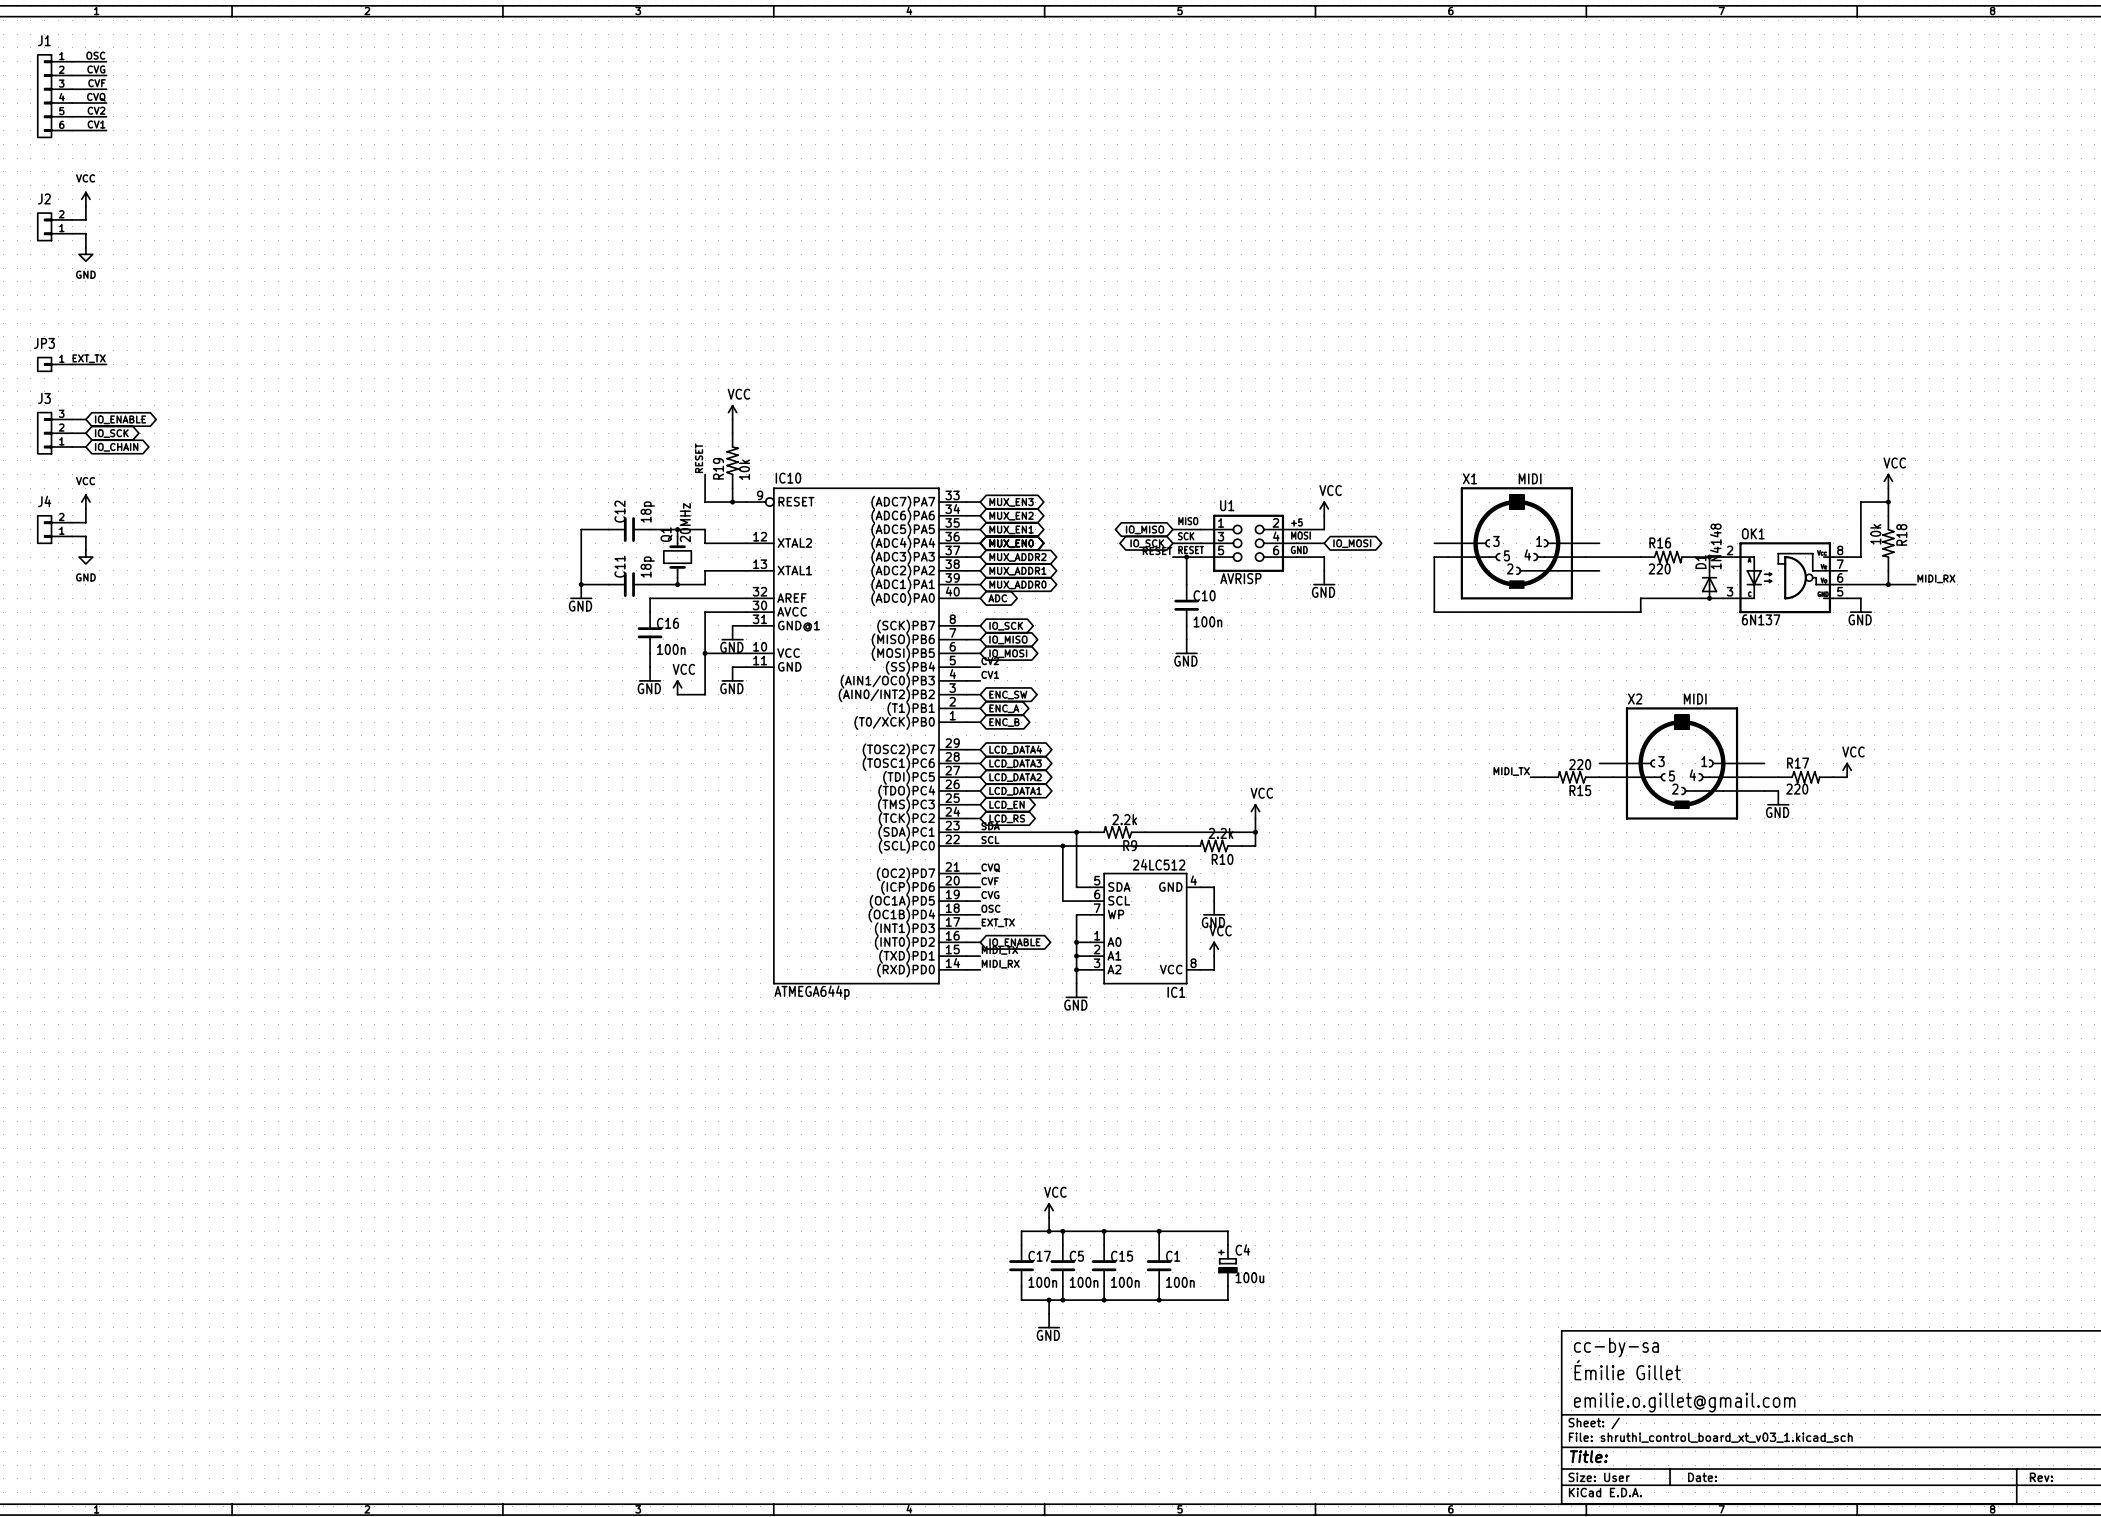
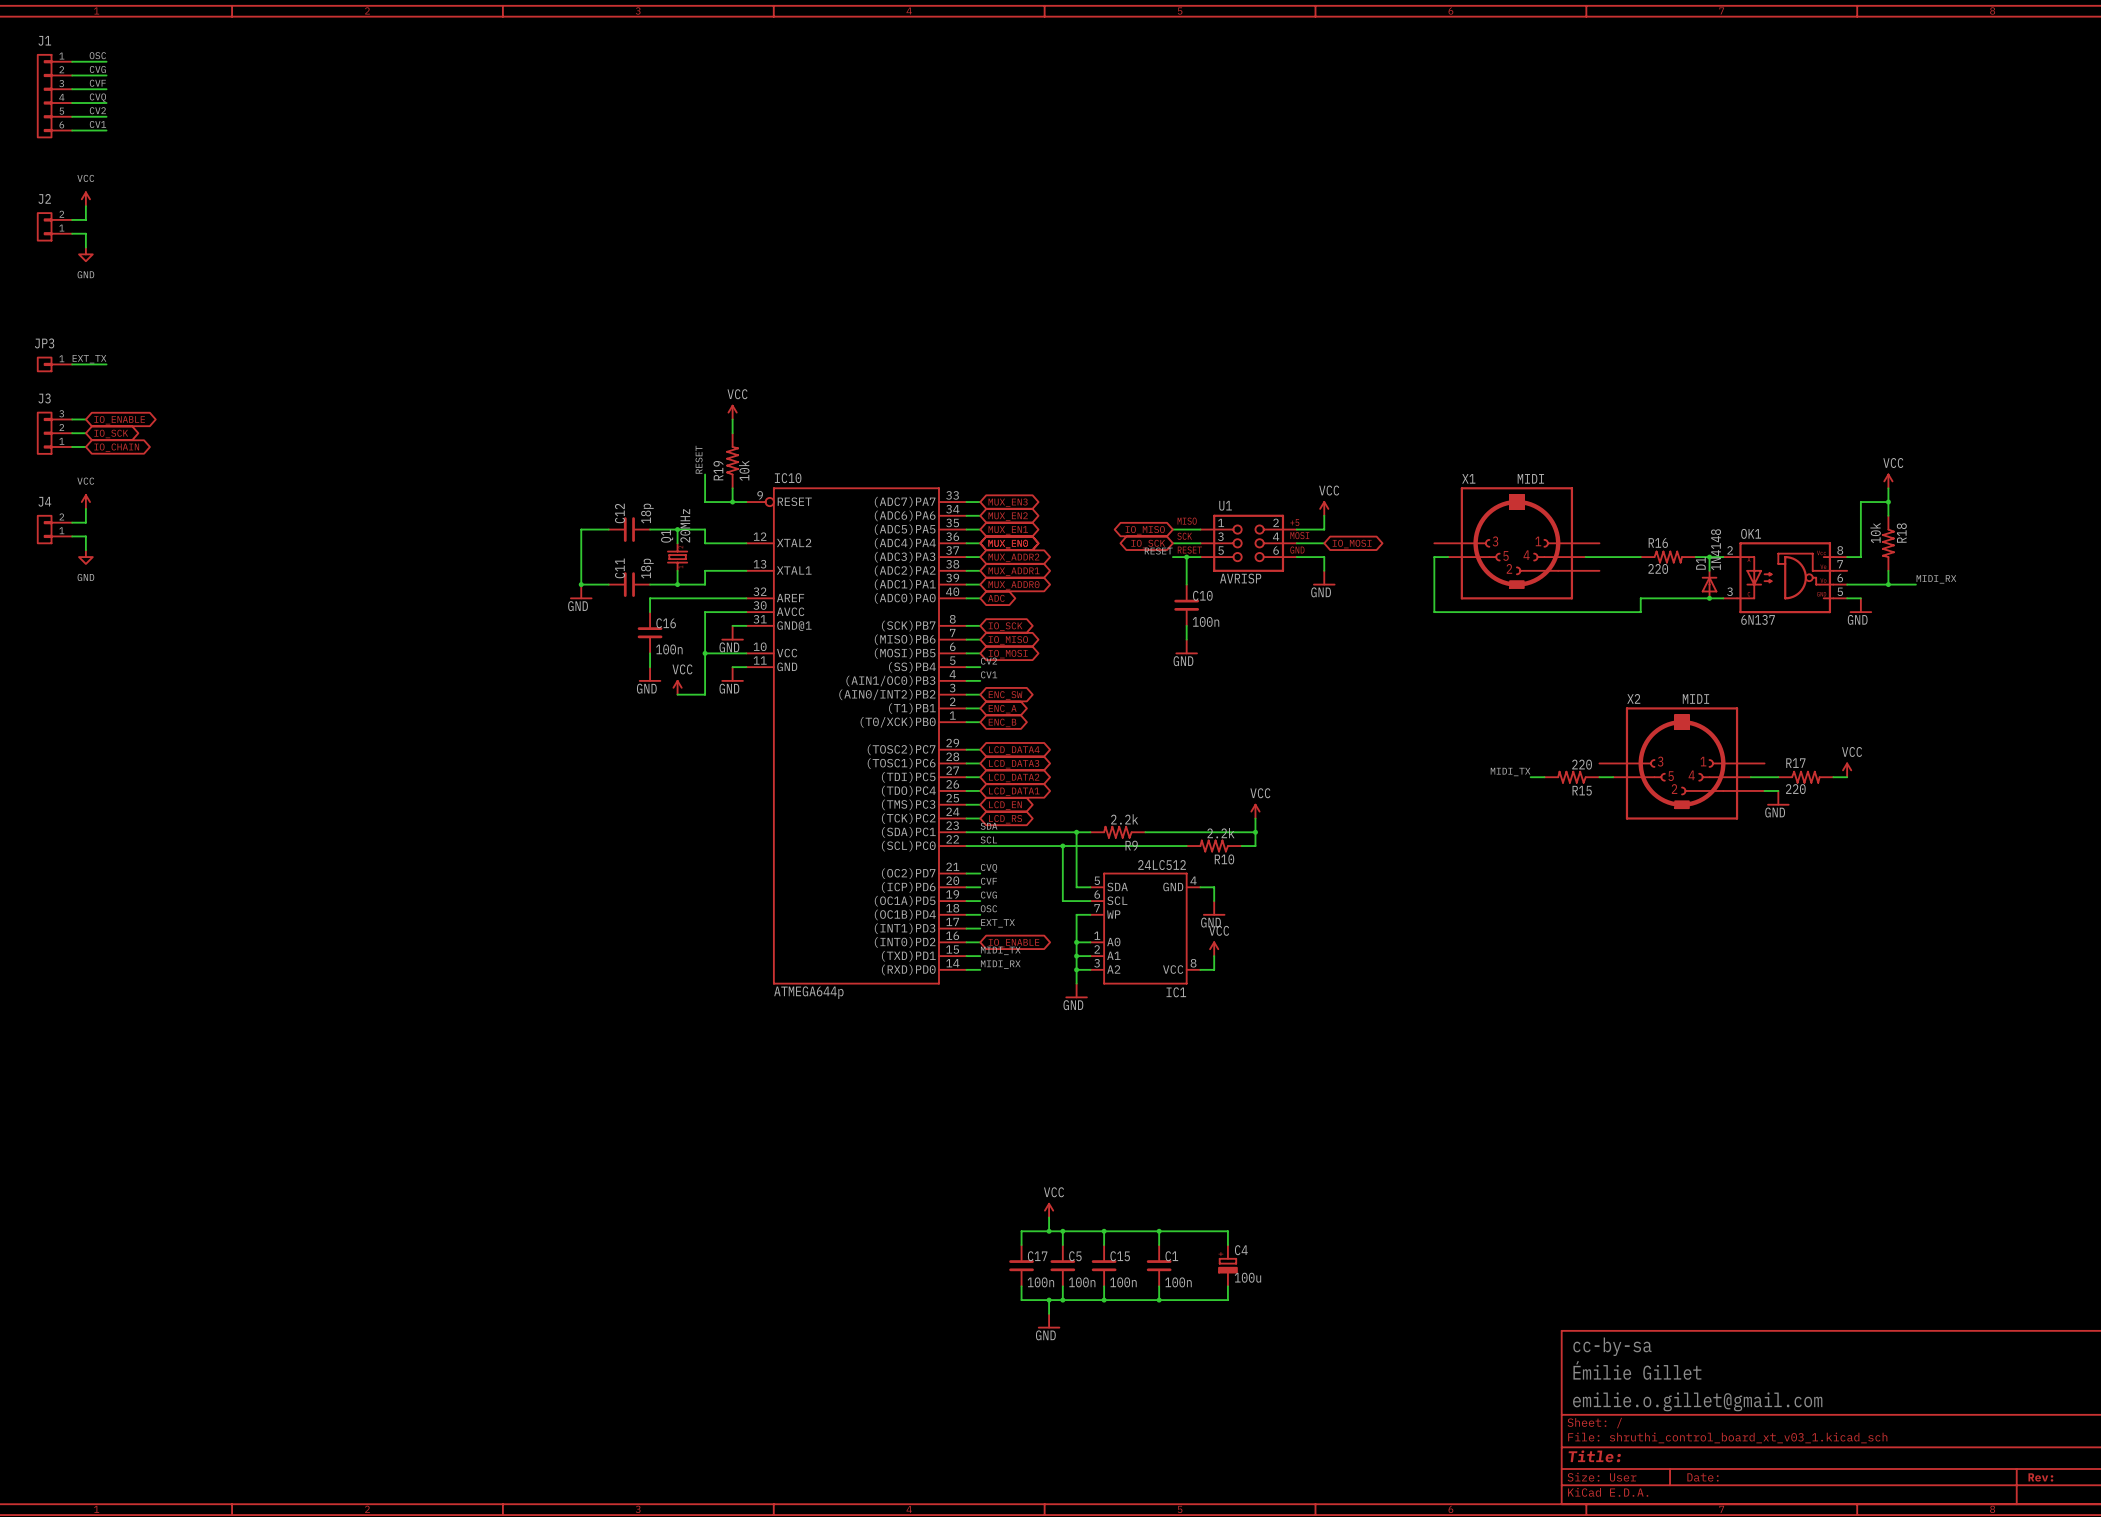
Q1 symbol: [662, 536, 693, 578] -> [667, 542, 688, 572]

